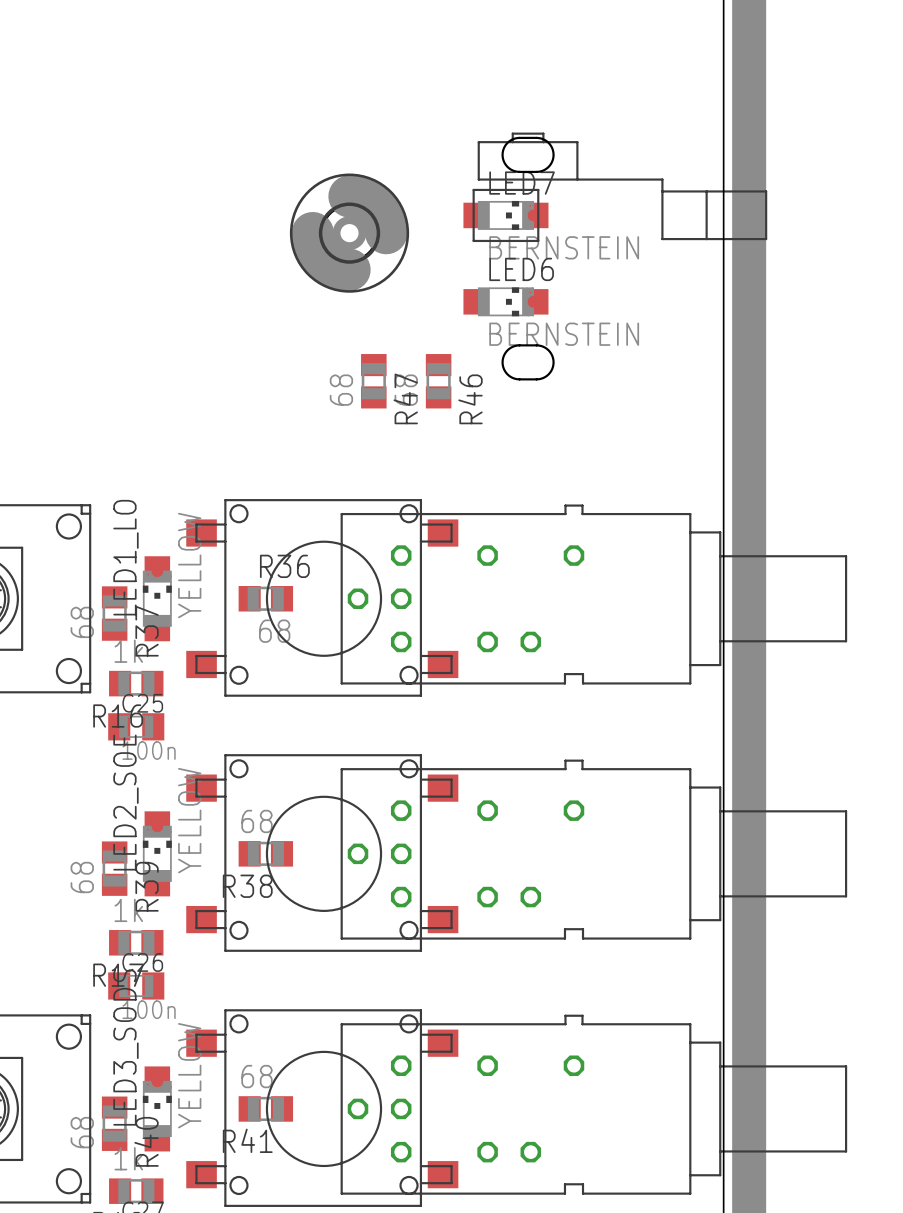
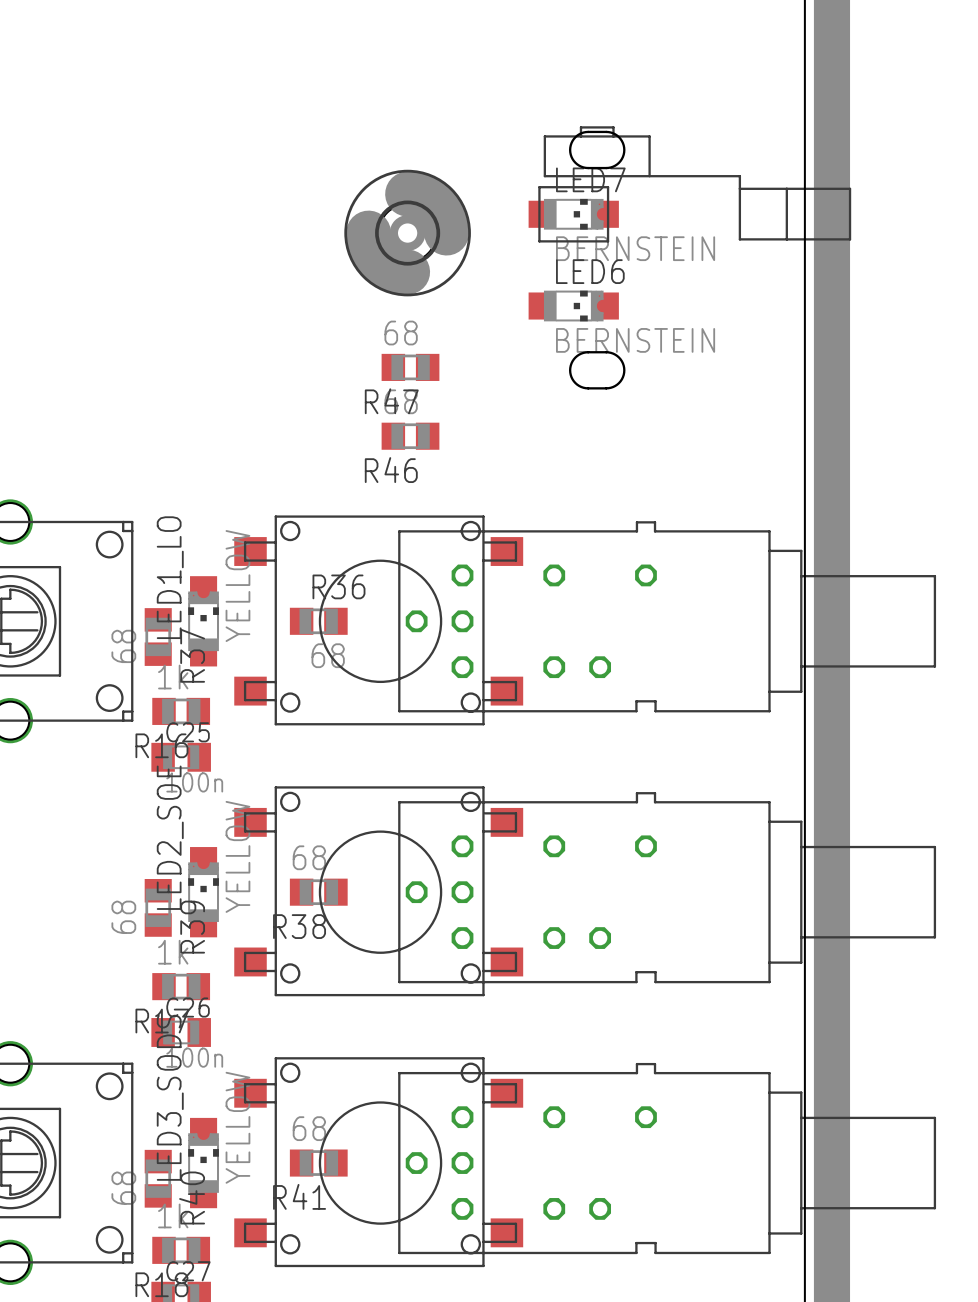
R47 rotation: 0° (373, 381) -> 90° clockwise (410, 367)
R46 rotation: 0° (438, 381) -> 90° clockwise (410, 436)
R46 position: (438, 381) -> (410, 436)

